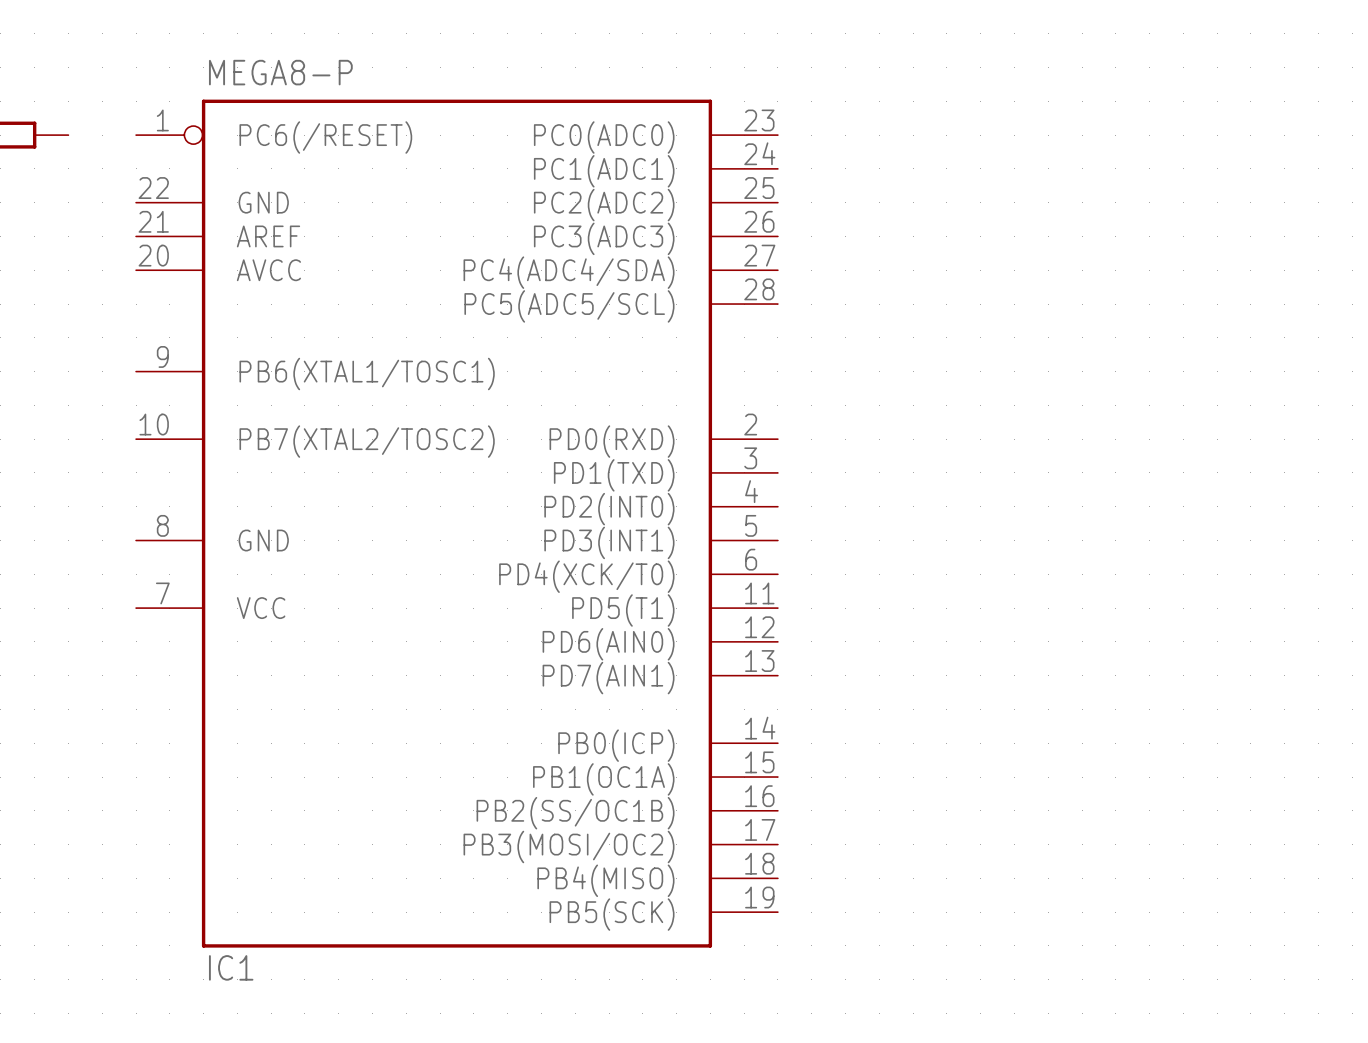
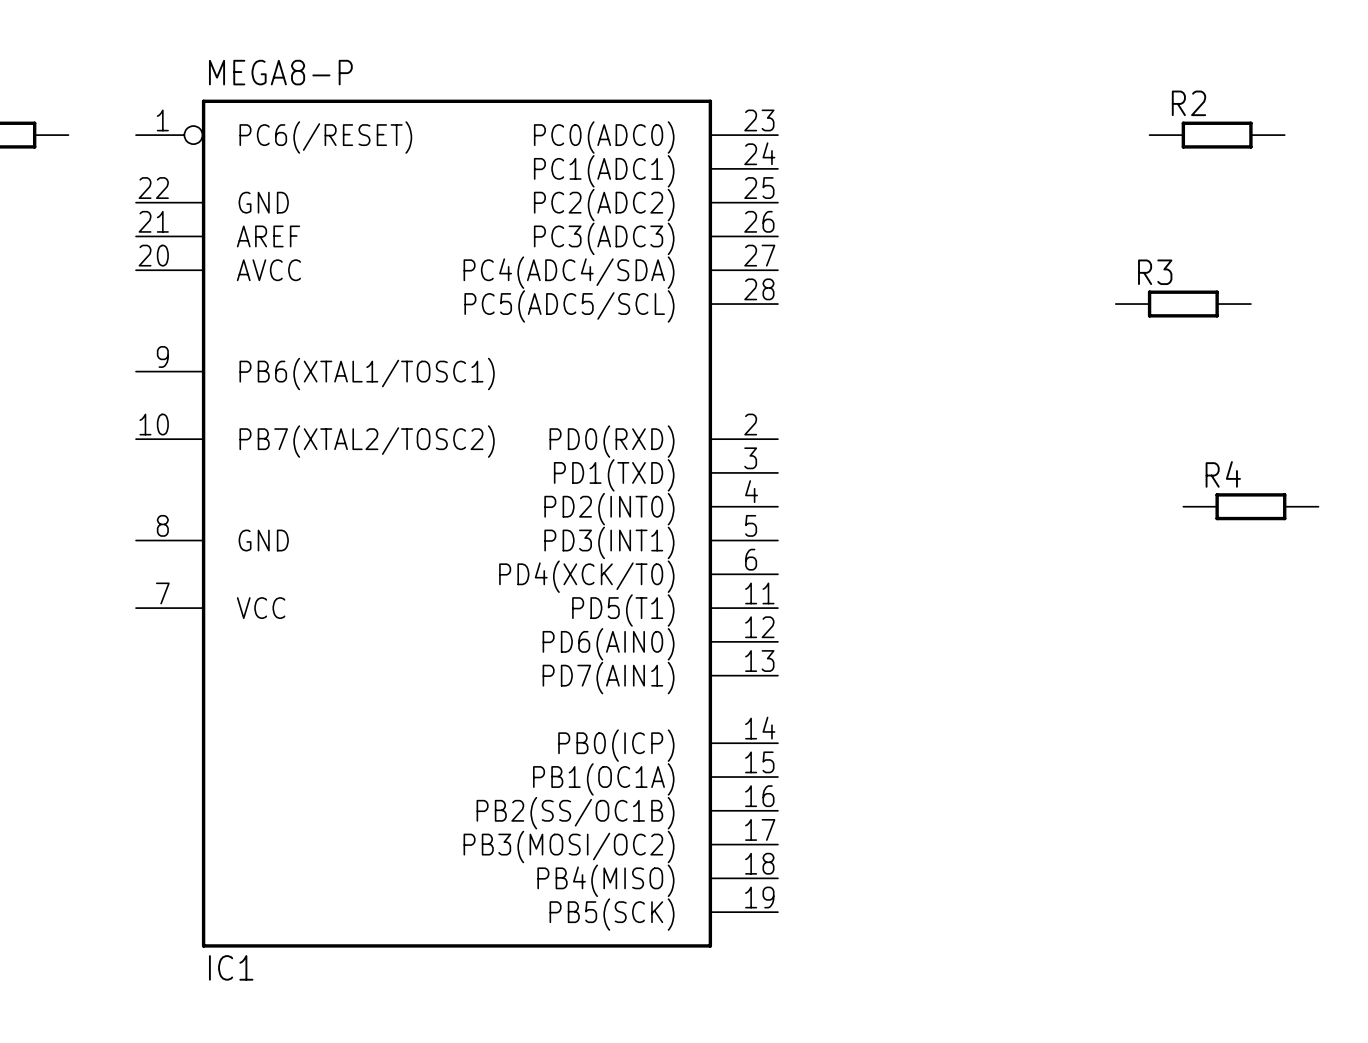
R2: none -> (1217, 135)
R3: none -> (1183, 304)
R4: none -> (1250, 506)

